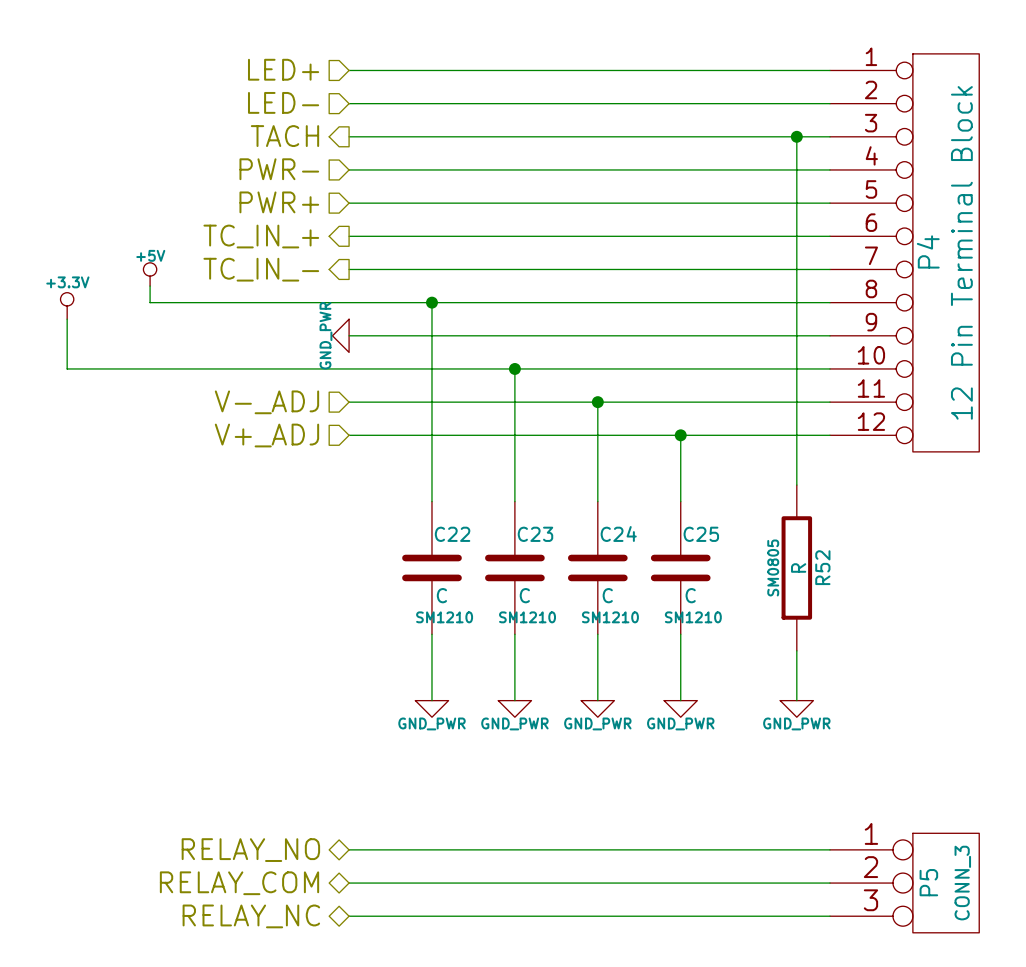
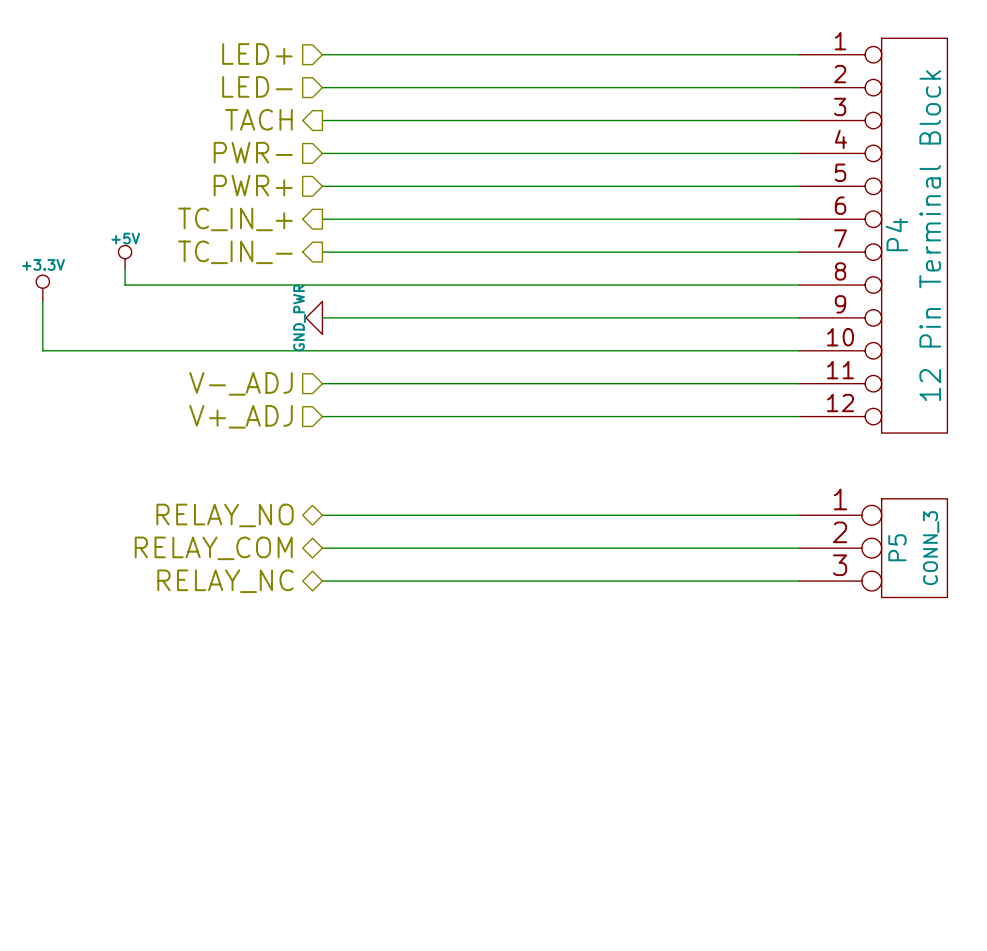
wire: (796, 136) (796, 485) -> none
junction: (796, 136) -> none
wire: (431, 302) (431, 501) -> none
junction: (431, 302) -> none
wire: (514, 368) (514, 501) -> none
junction: (514, 368) -> none
wire: (597, 402) (597, 501) -> none
junction: (597, 402) -> none
wire: (680, 435) (680, 501) -> none
junction: (680, 435) -> none
C22: C (431, 567) -> none
C23: C (514, 567) -> none
C24: C (597, 567) -> none
C25: C (680, 567) -> none
R52: R (796, 567) -> none
wire: (431, 634) (431, 700) -> none
wire: (514, 634) (514, 700) -> none
wire: (597, 634) (597, 700) -> none
wire: (680, 634) (680, 700) -> none
wire: (796, 650) (796, 700) -> none
power symbol: GND_PWR (431, 708) -> none
power symbol: GND_PWR (514, 708) -> none
power symbol: GND_PWR (597, 708) -> none
power symbol: GND_PWR (680, 708) -> none
power symbol: GND_PWR (796, 708) -> none
wire: (349, 849) (829, 849) -> (322, 515) (799, 515)
hierarchical label position: RELAY_NO (250, 850) -> RELAY_NO (225, 515)
hierarchical label position: RELAY_COM (239, 883) -> RELAY_COM (213, 548)
wire: (349, 883) (829, 883) -> (322, 548) (799, 548)
P5 position: (904, 883) -> (873, 548)
hierarchical label position: RELAY_NC (251, 916) -> RELAY_NC (225, 581)
wire: (349, 916) (829, 916) -> (322, 581) (799, 581)

